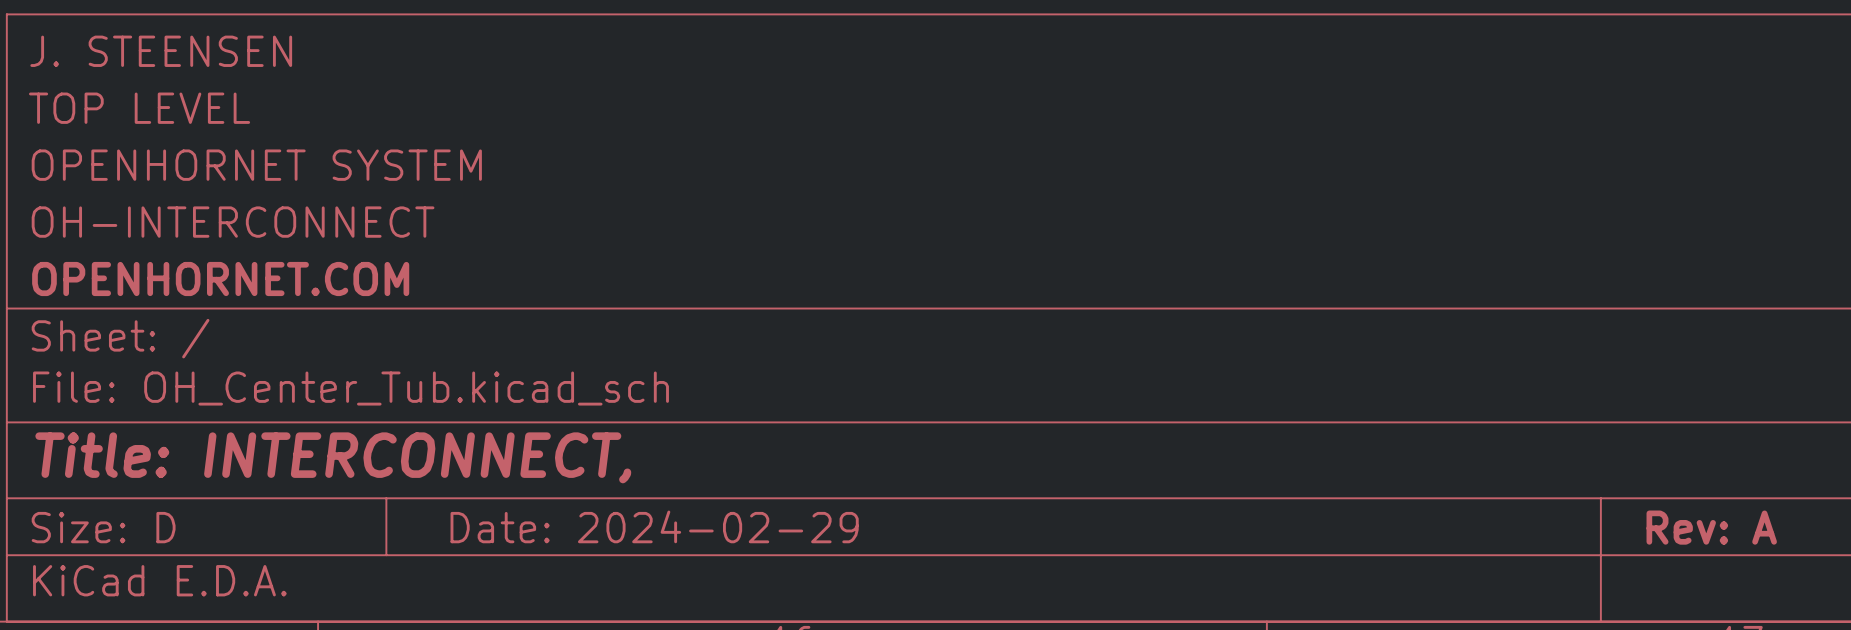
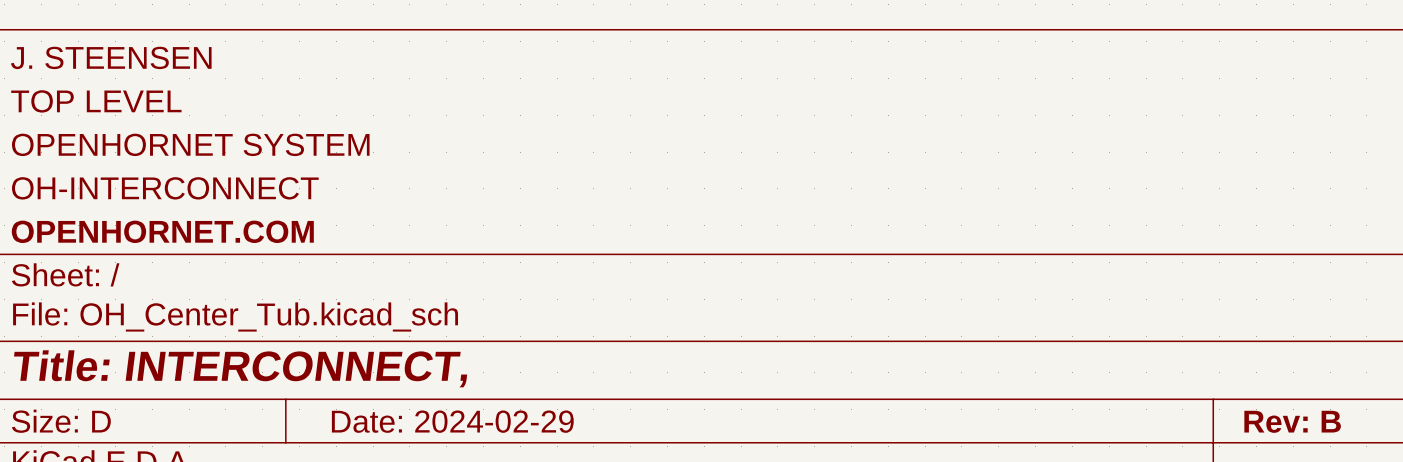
title block: Rev: A (1711, 527) -> Rev: B (1292, 421)

